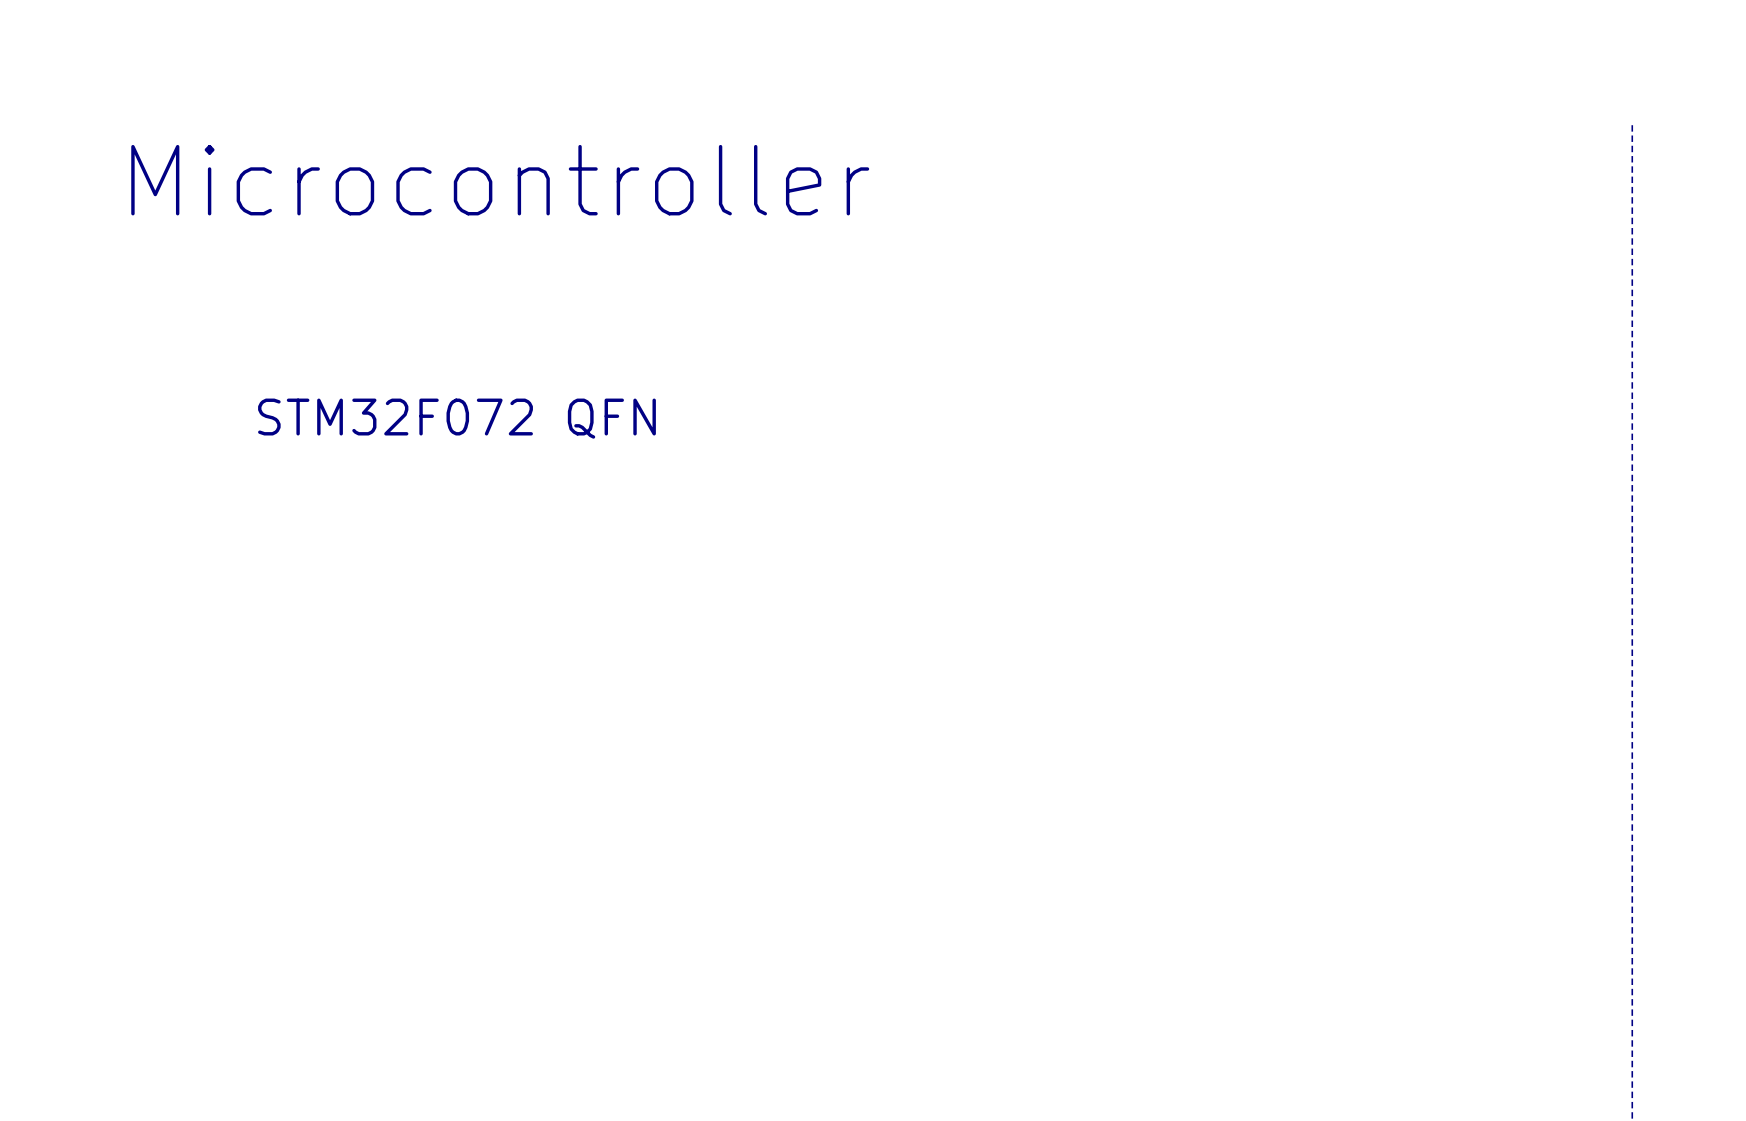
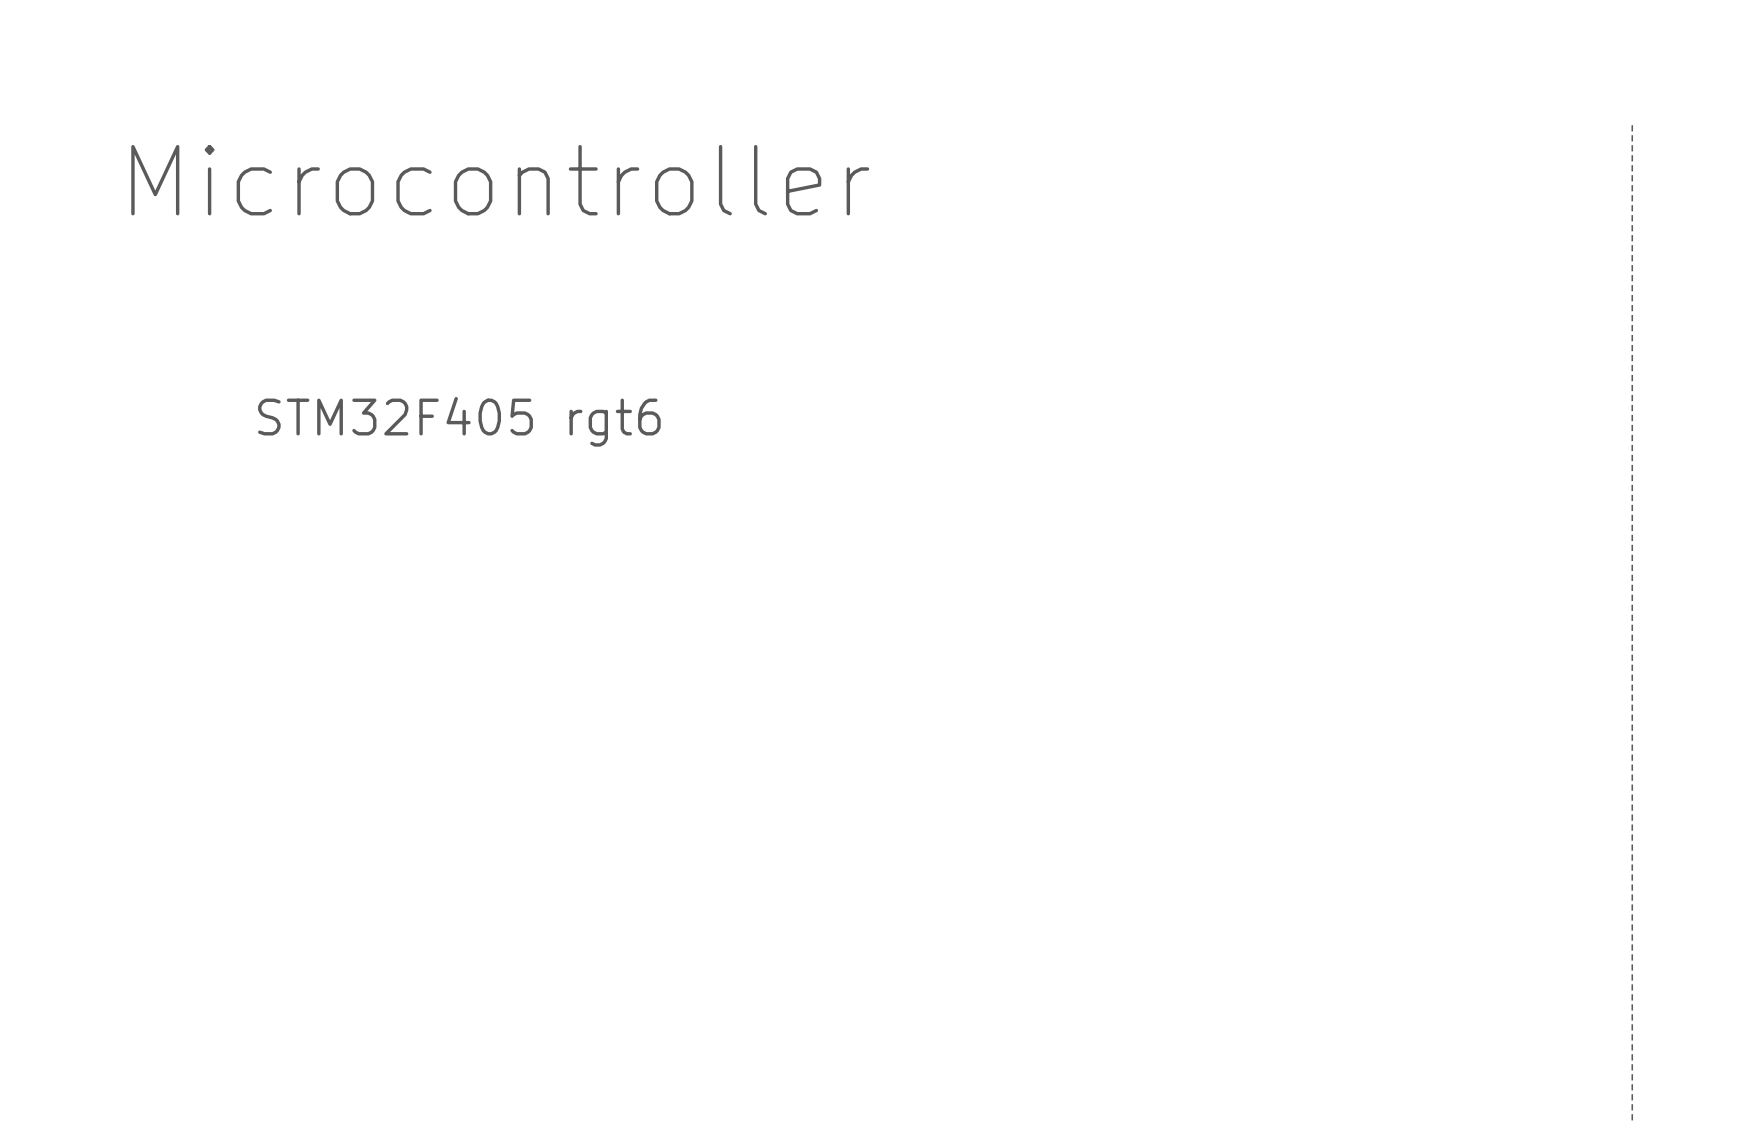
text: STM32F072 QFN (456, 418) -> STM32F405 rgt6 (459, 421)

